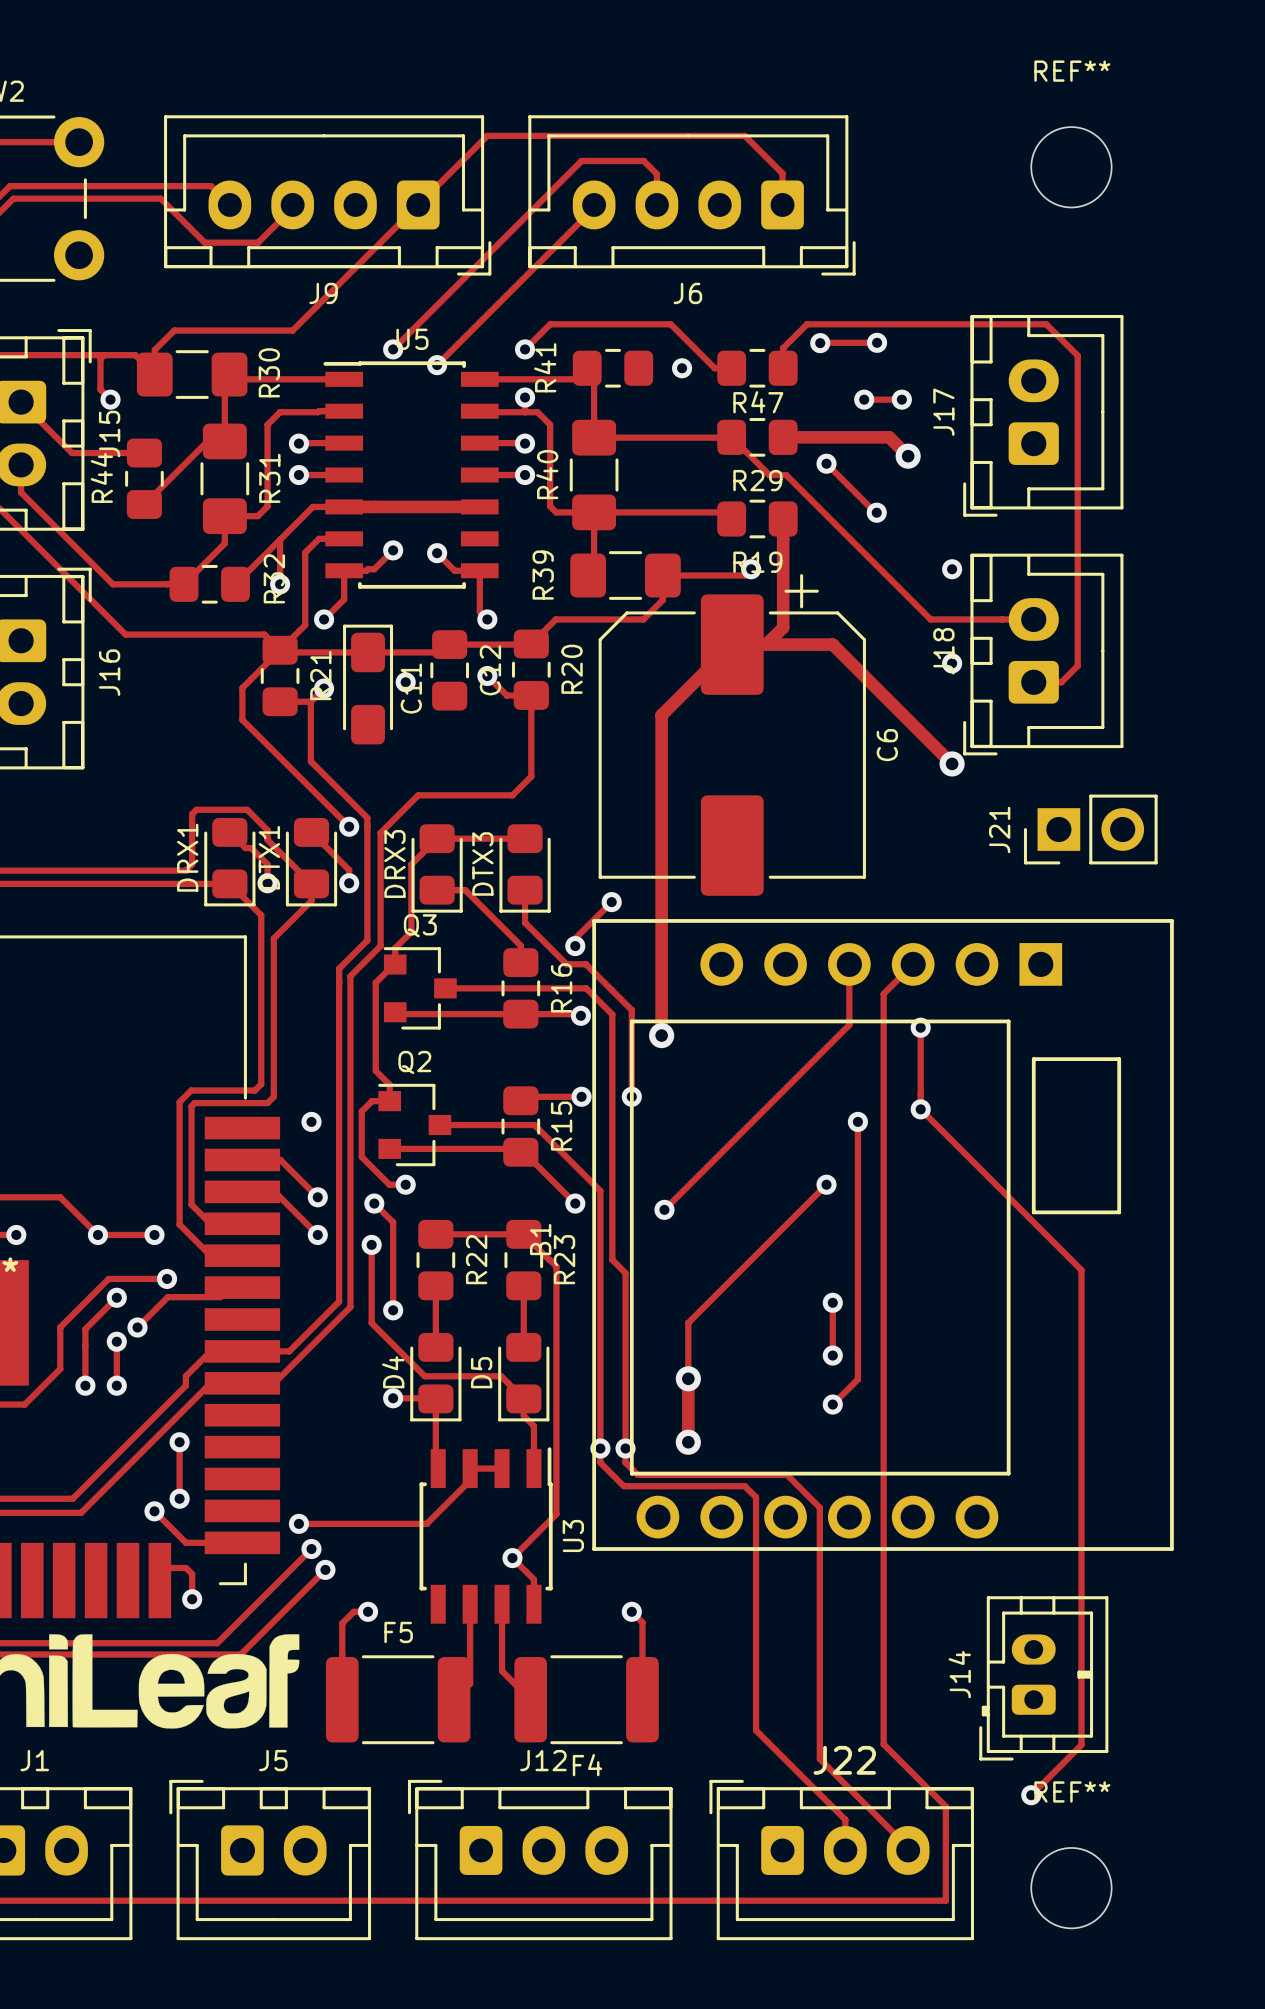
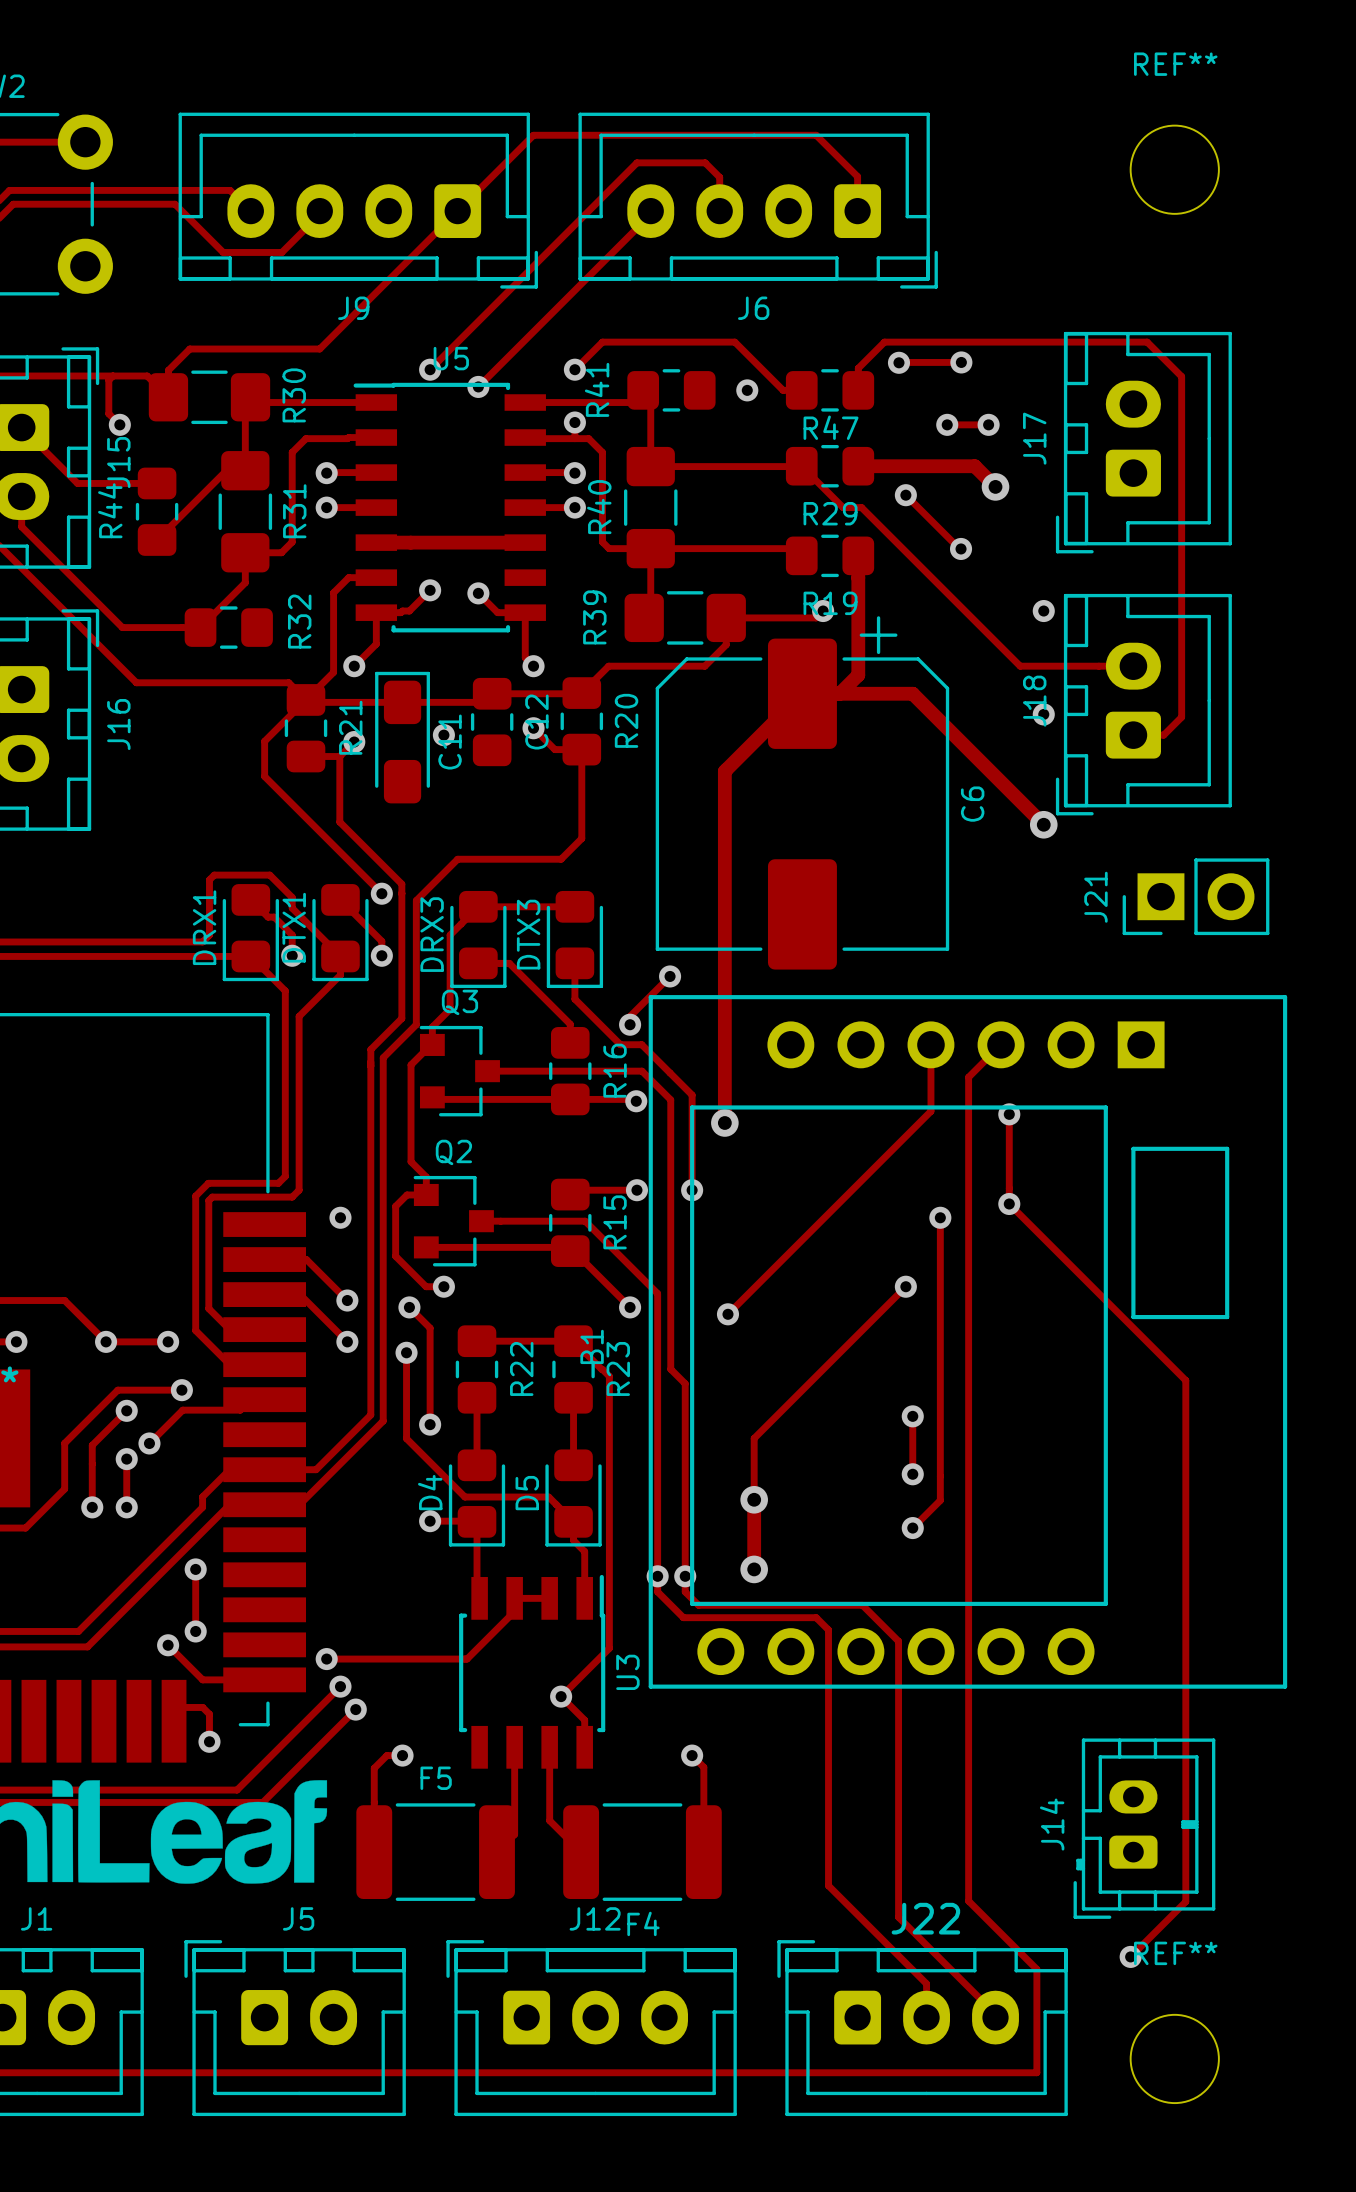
track: (344, 506) (312, 506) (235, 584) -> none
track: (280, 539) (280, 584) -> none
via: (280, 584) -> none

